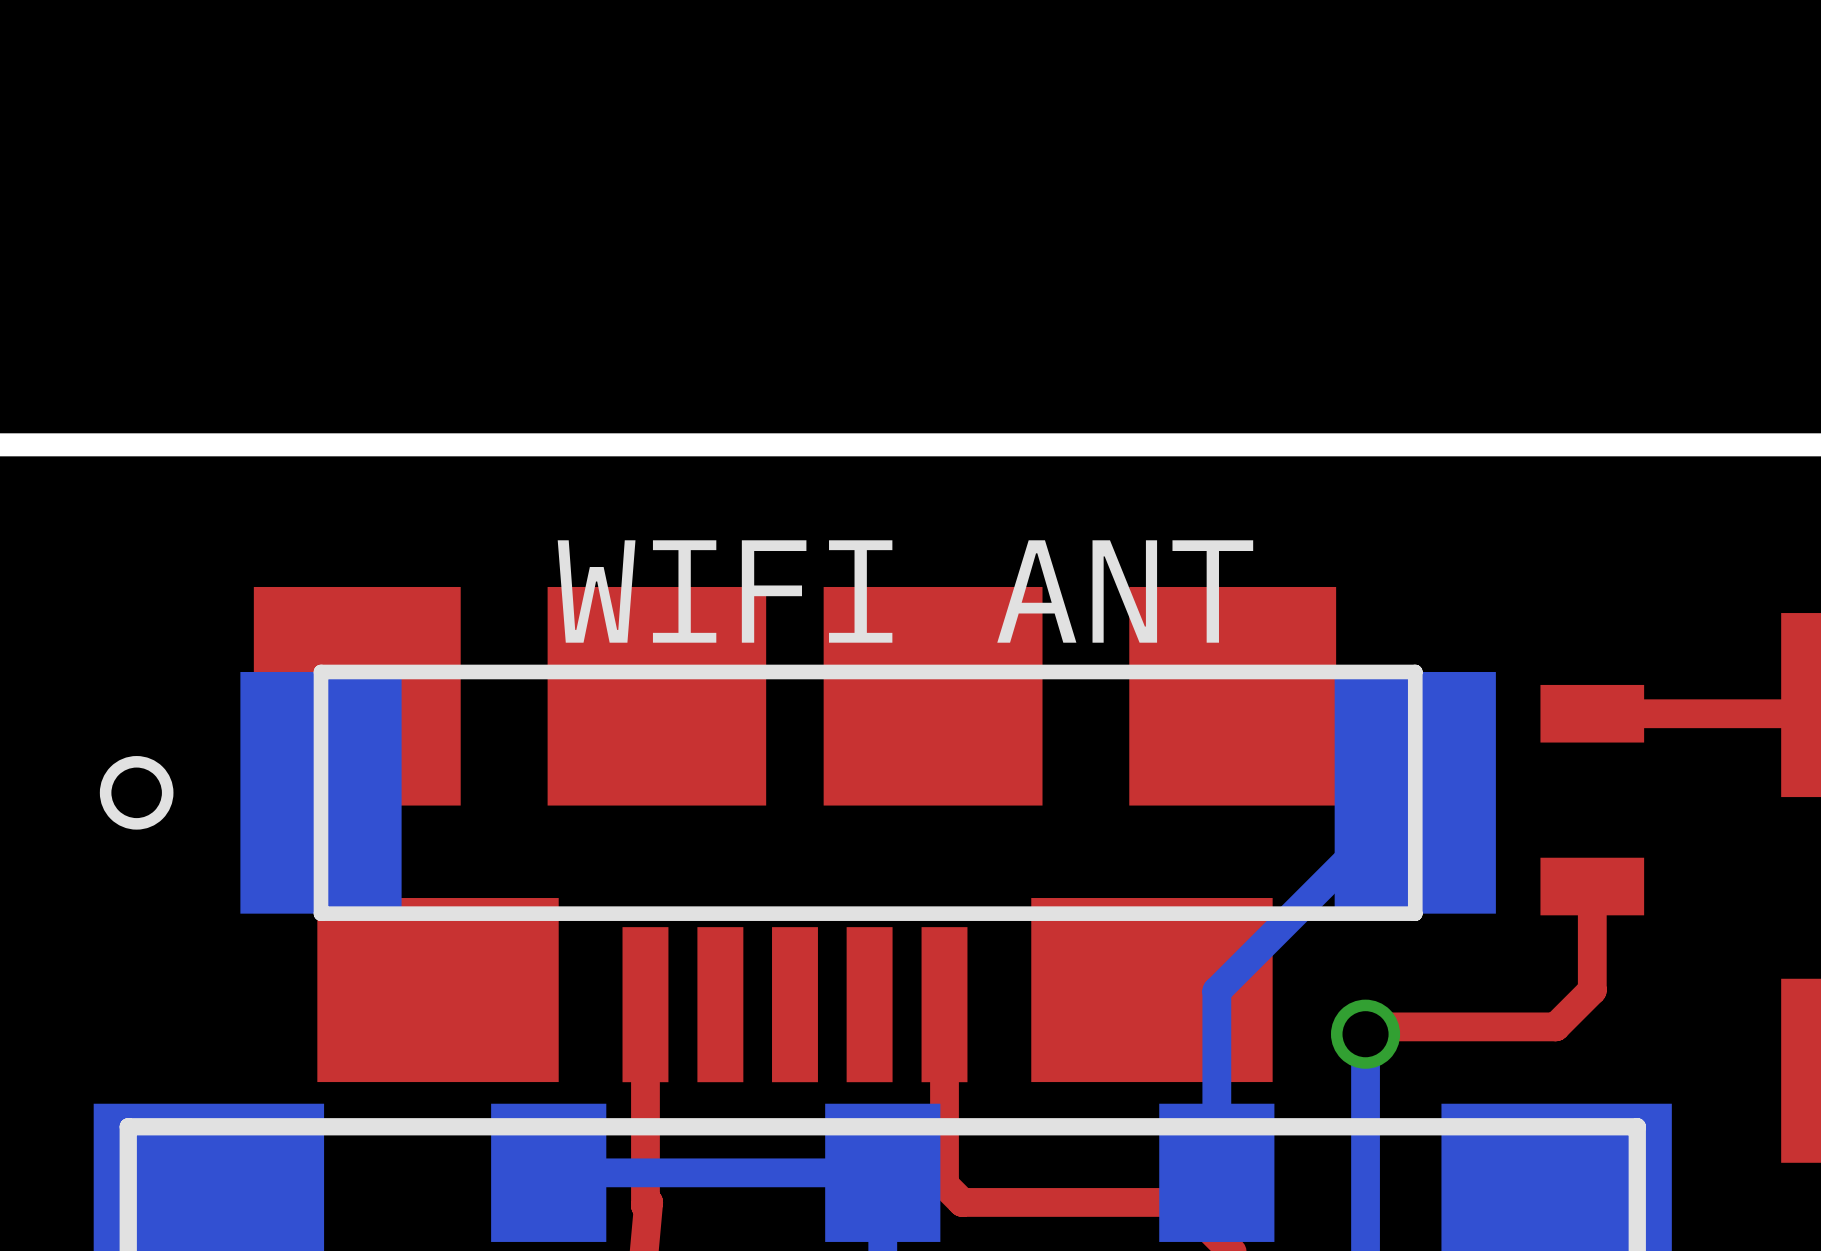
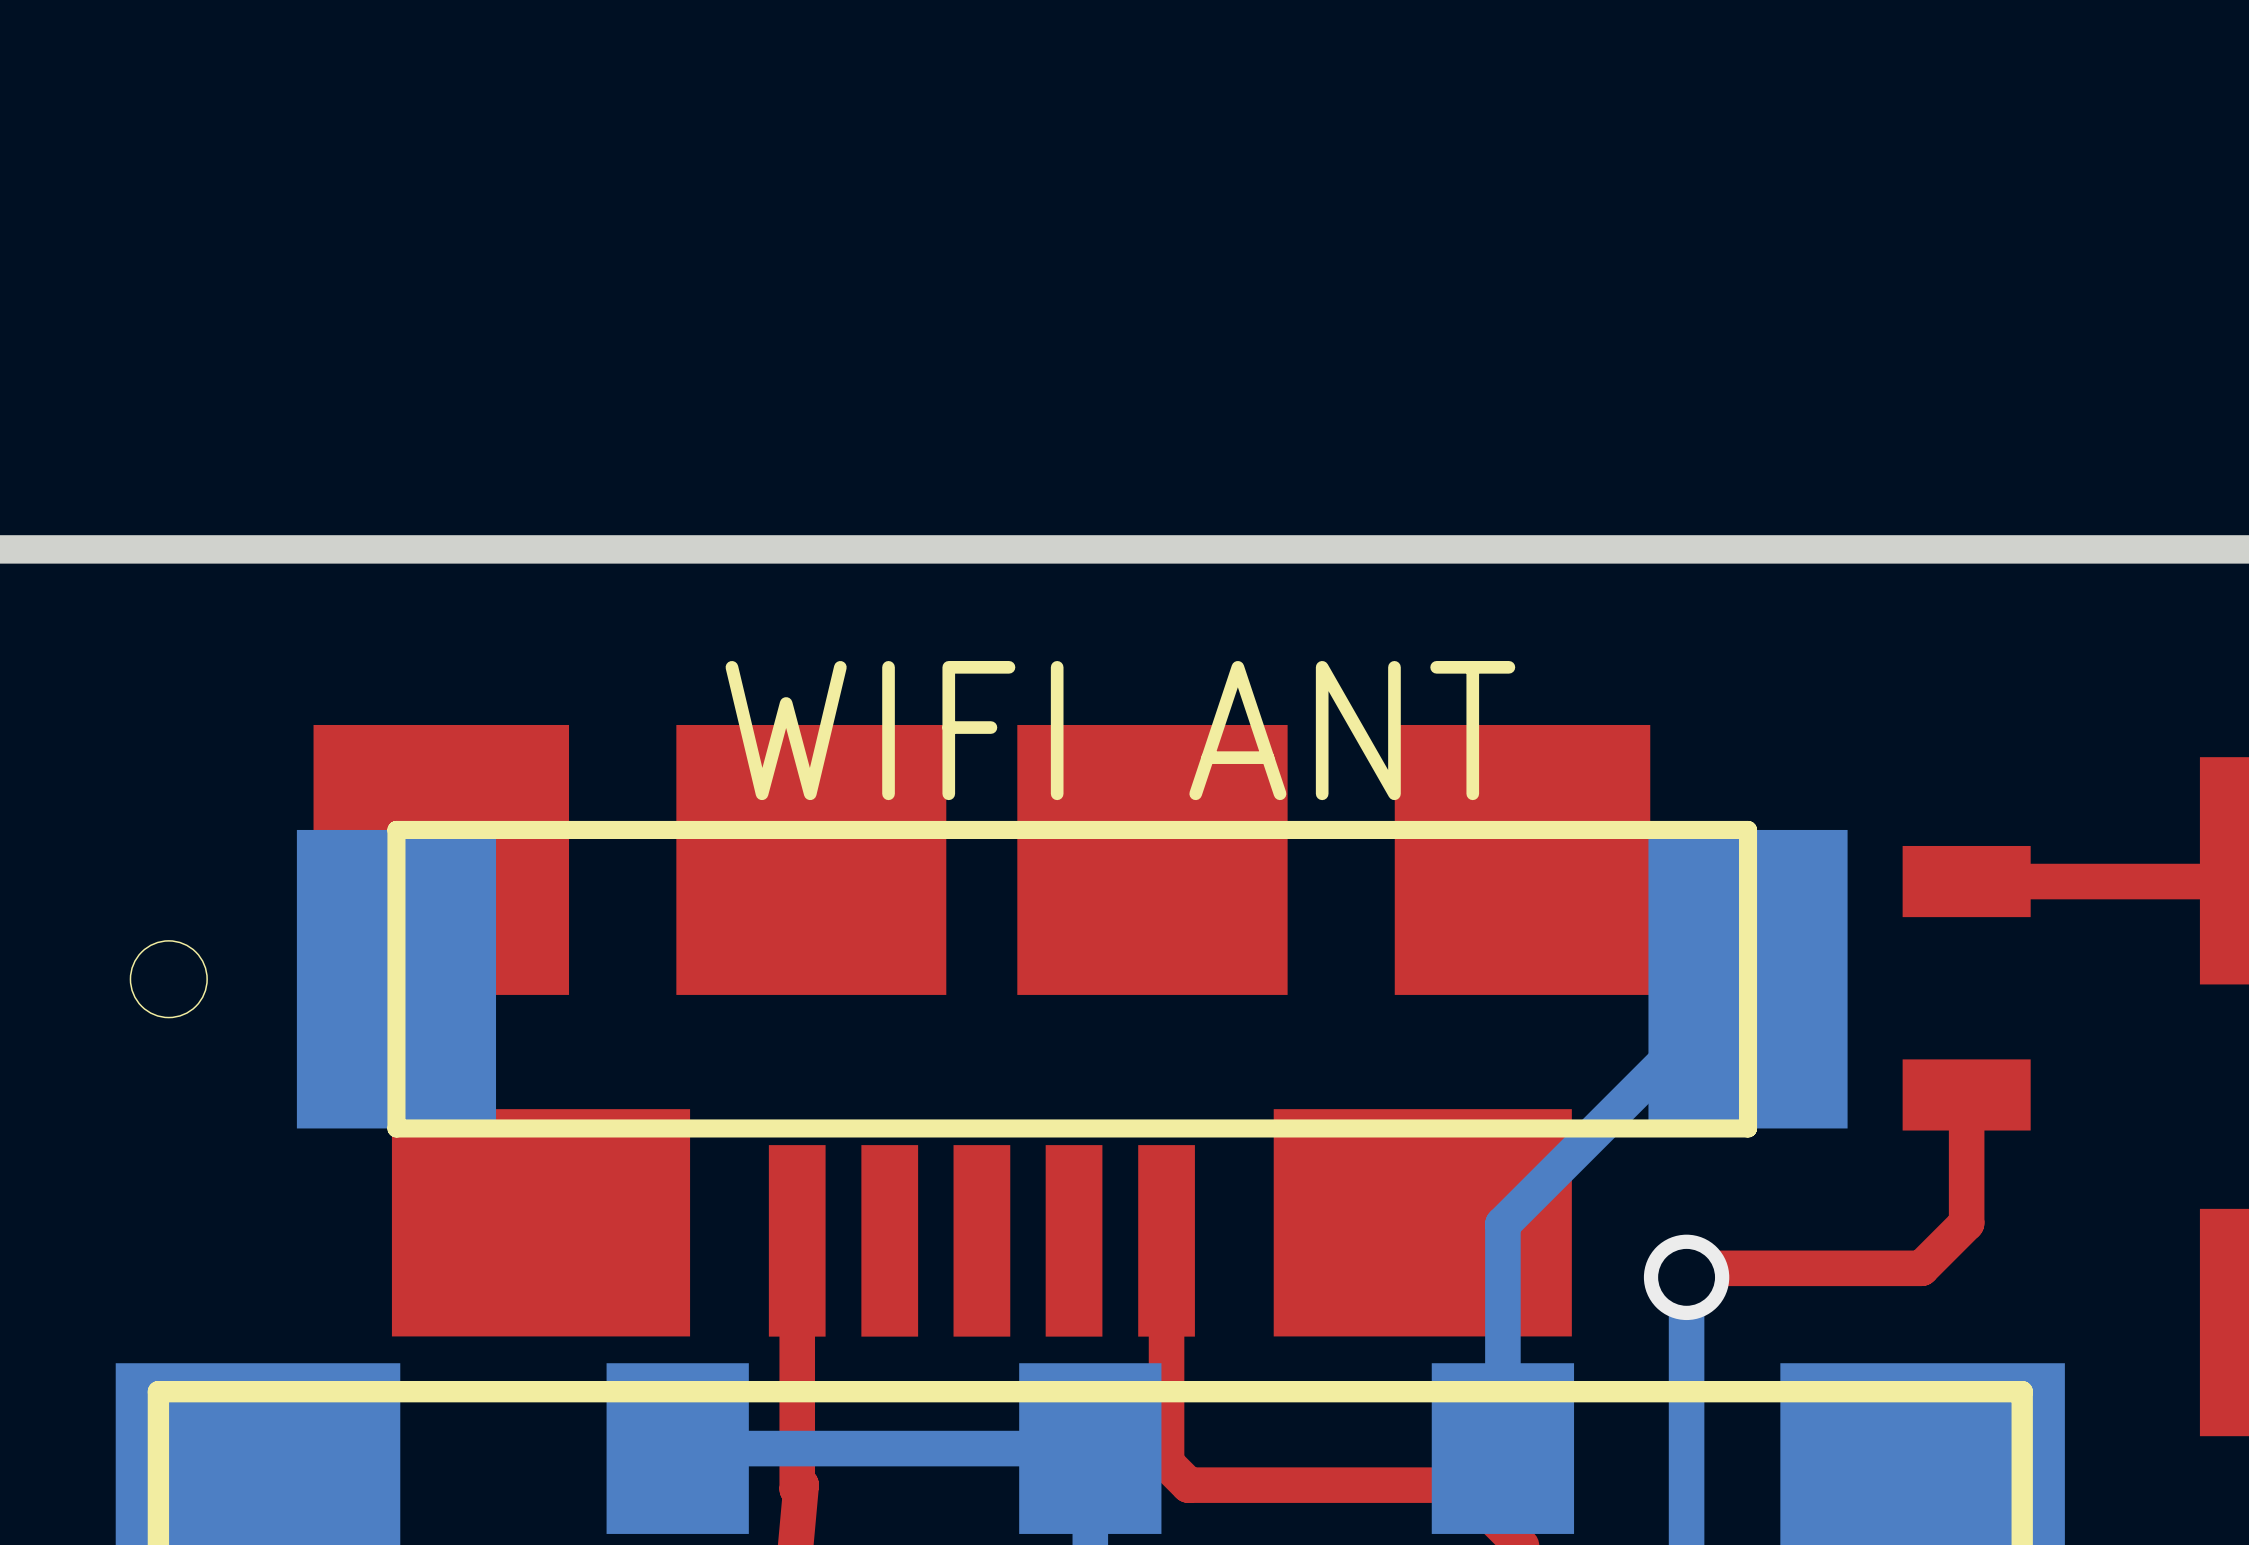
WIFI ANT footprint: [99, 664, 1496, 921] -> [130, 820, 1848, 1138]

